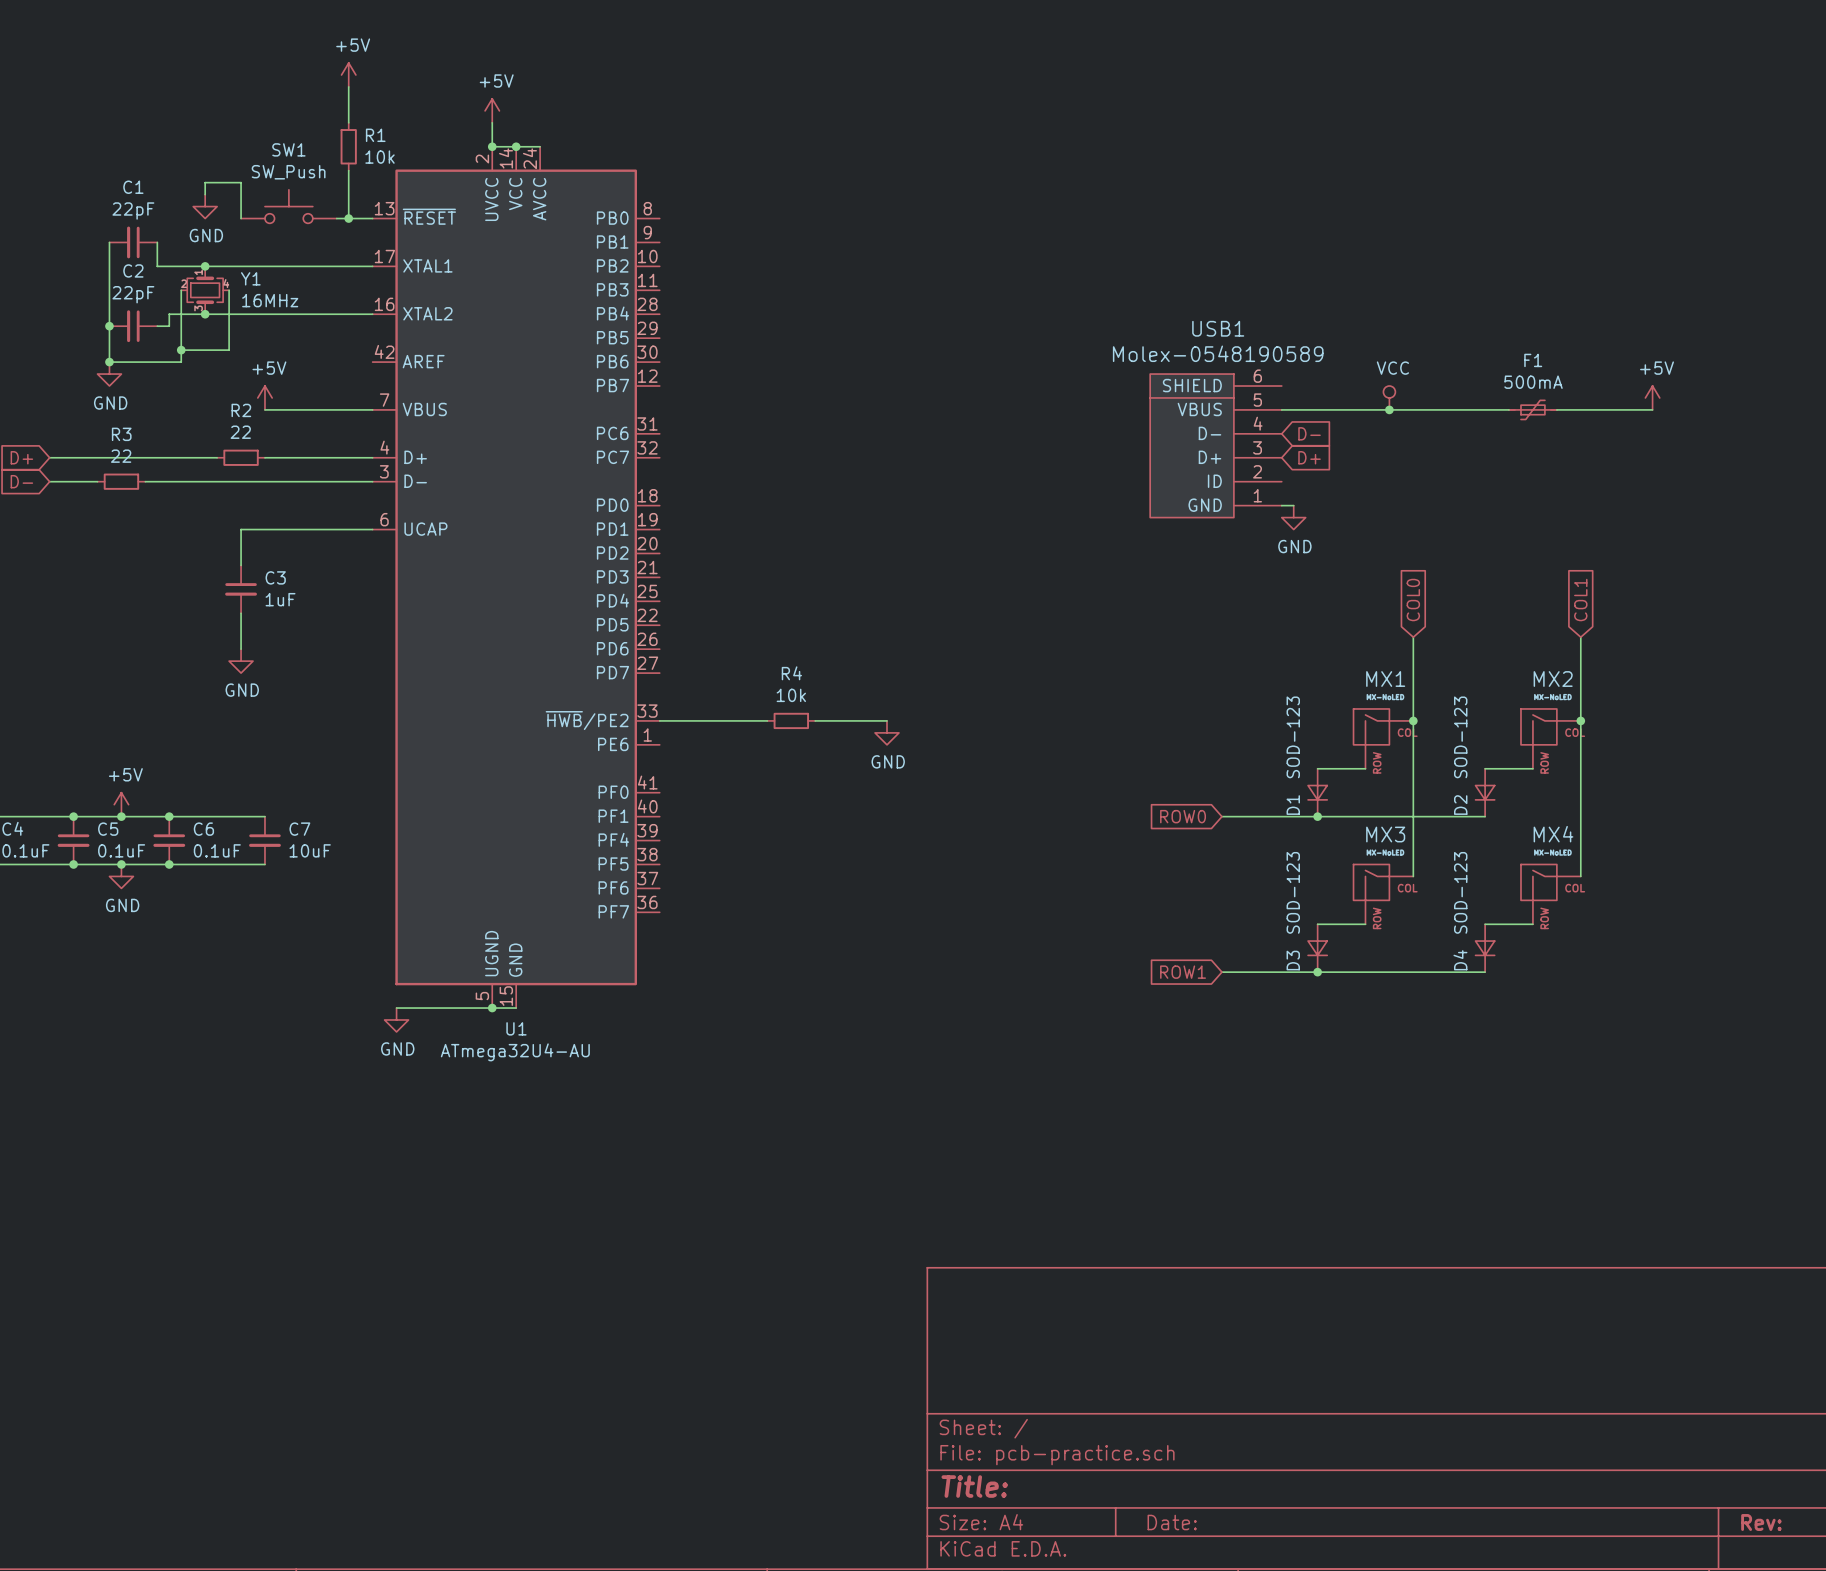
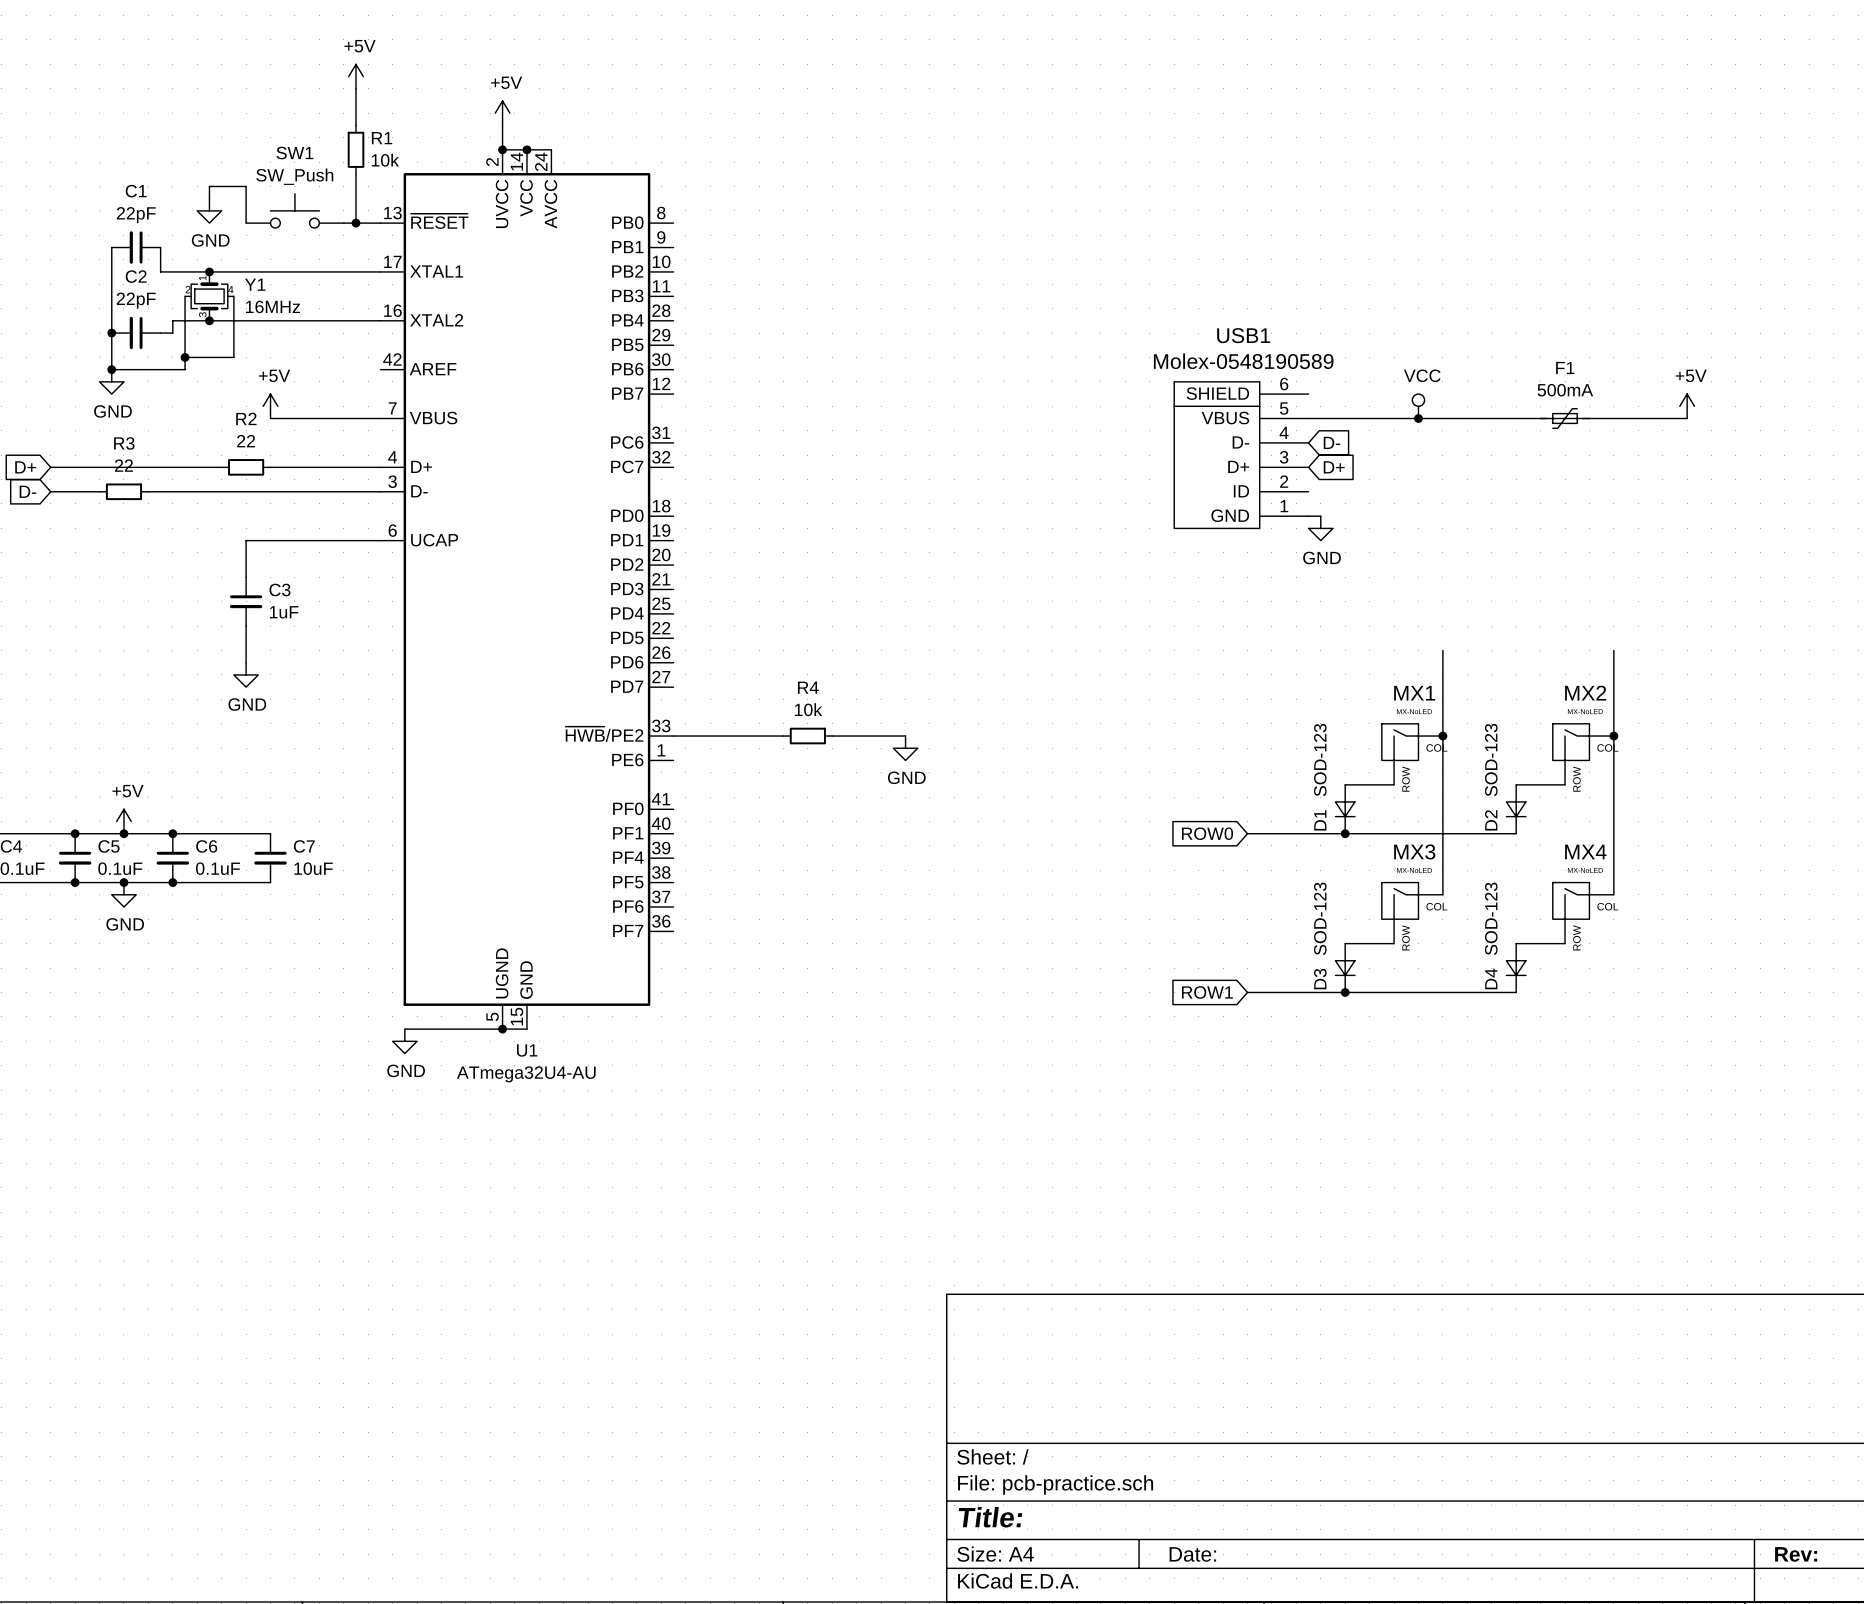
global label: COL0 (1413, 600) -> none
global label: COL1 (1580, 600) -> none

